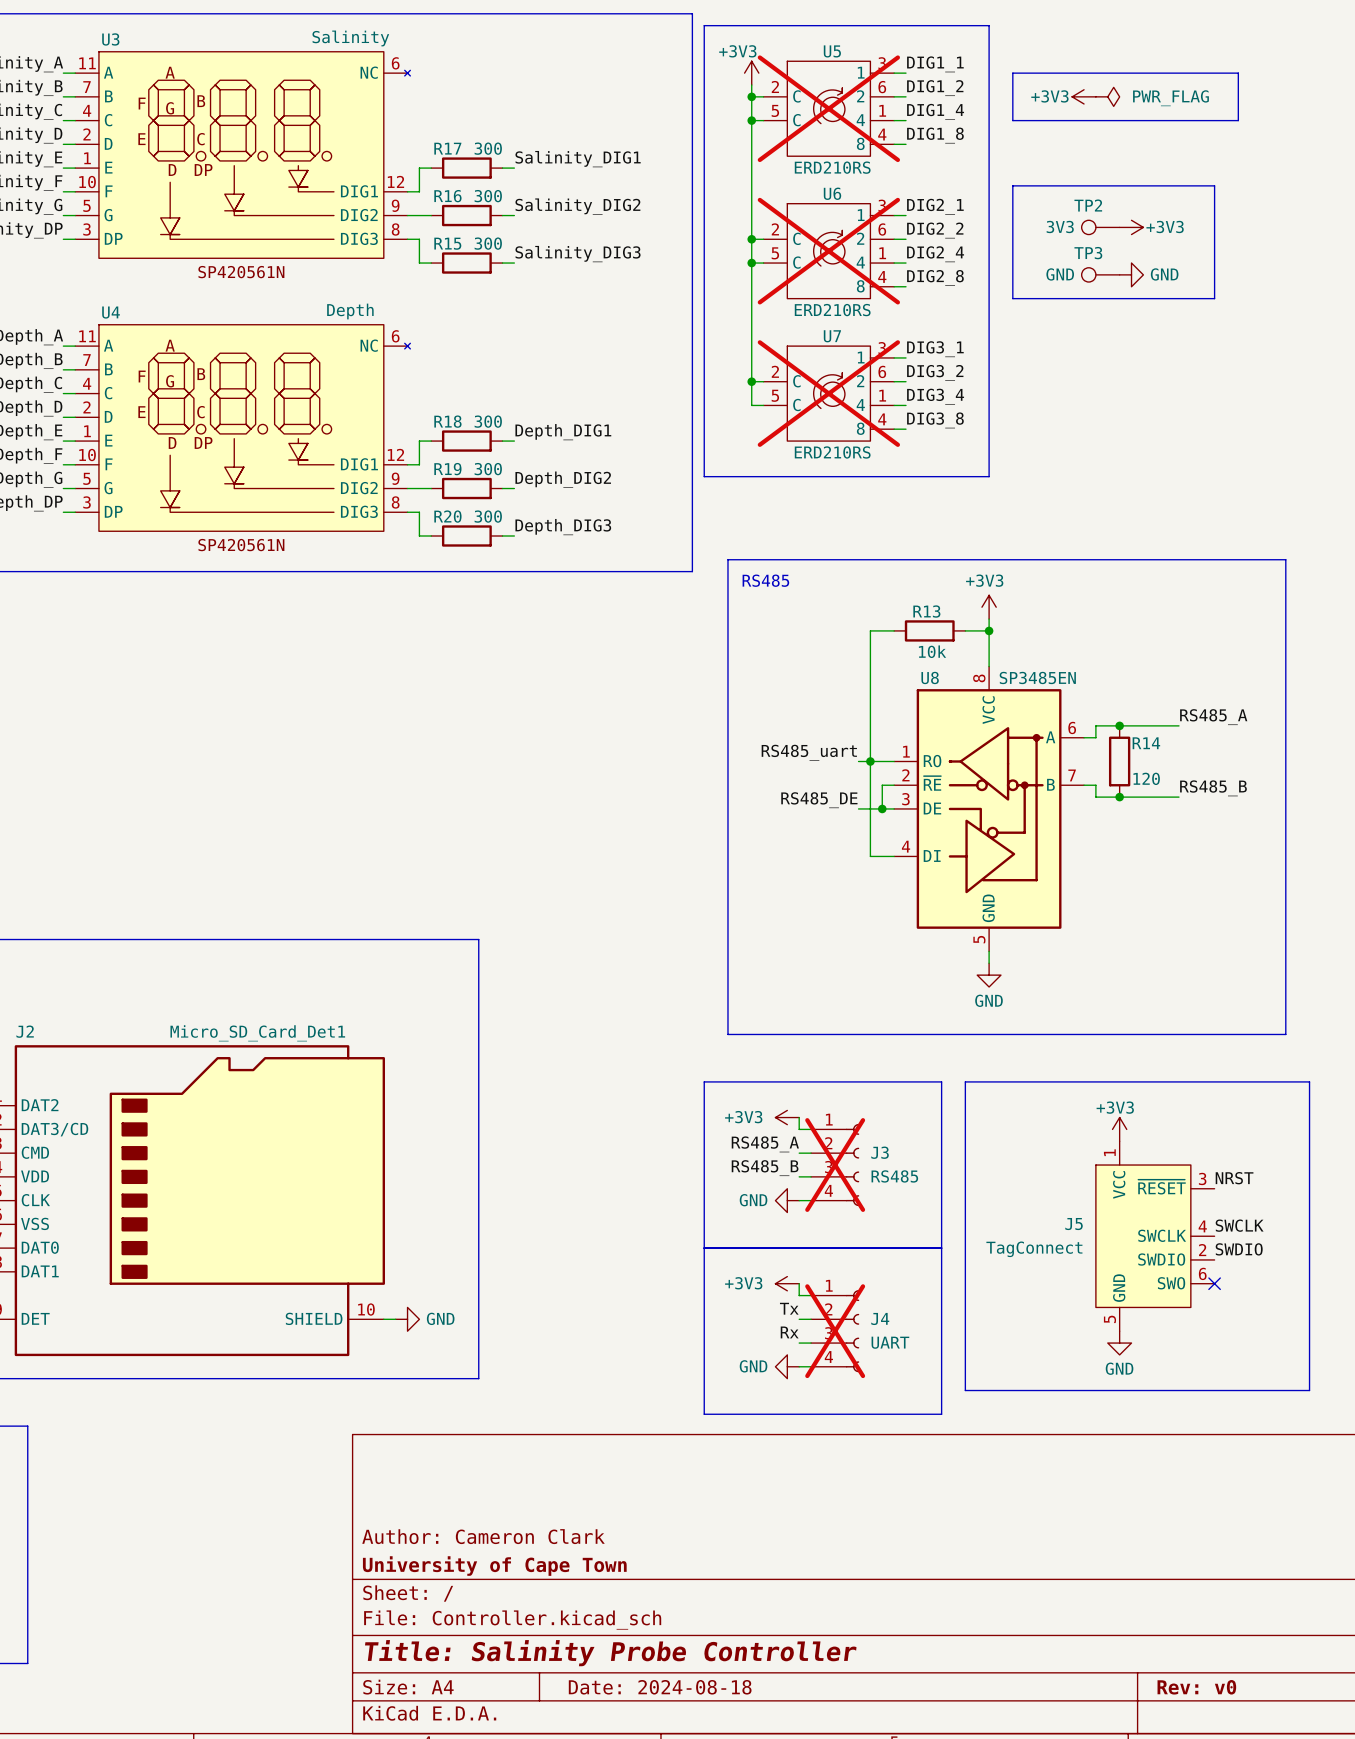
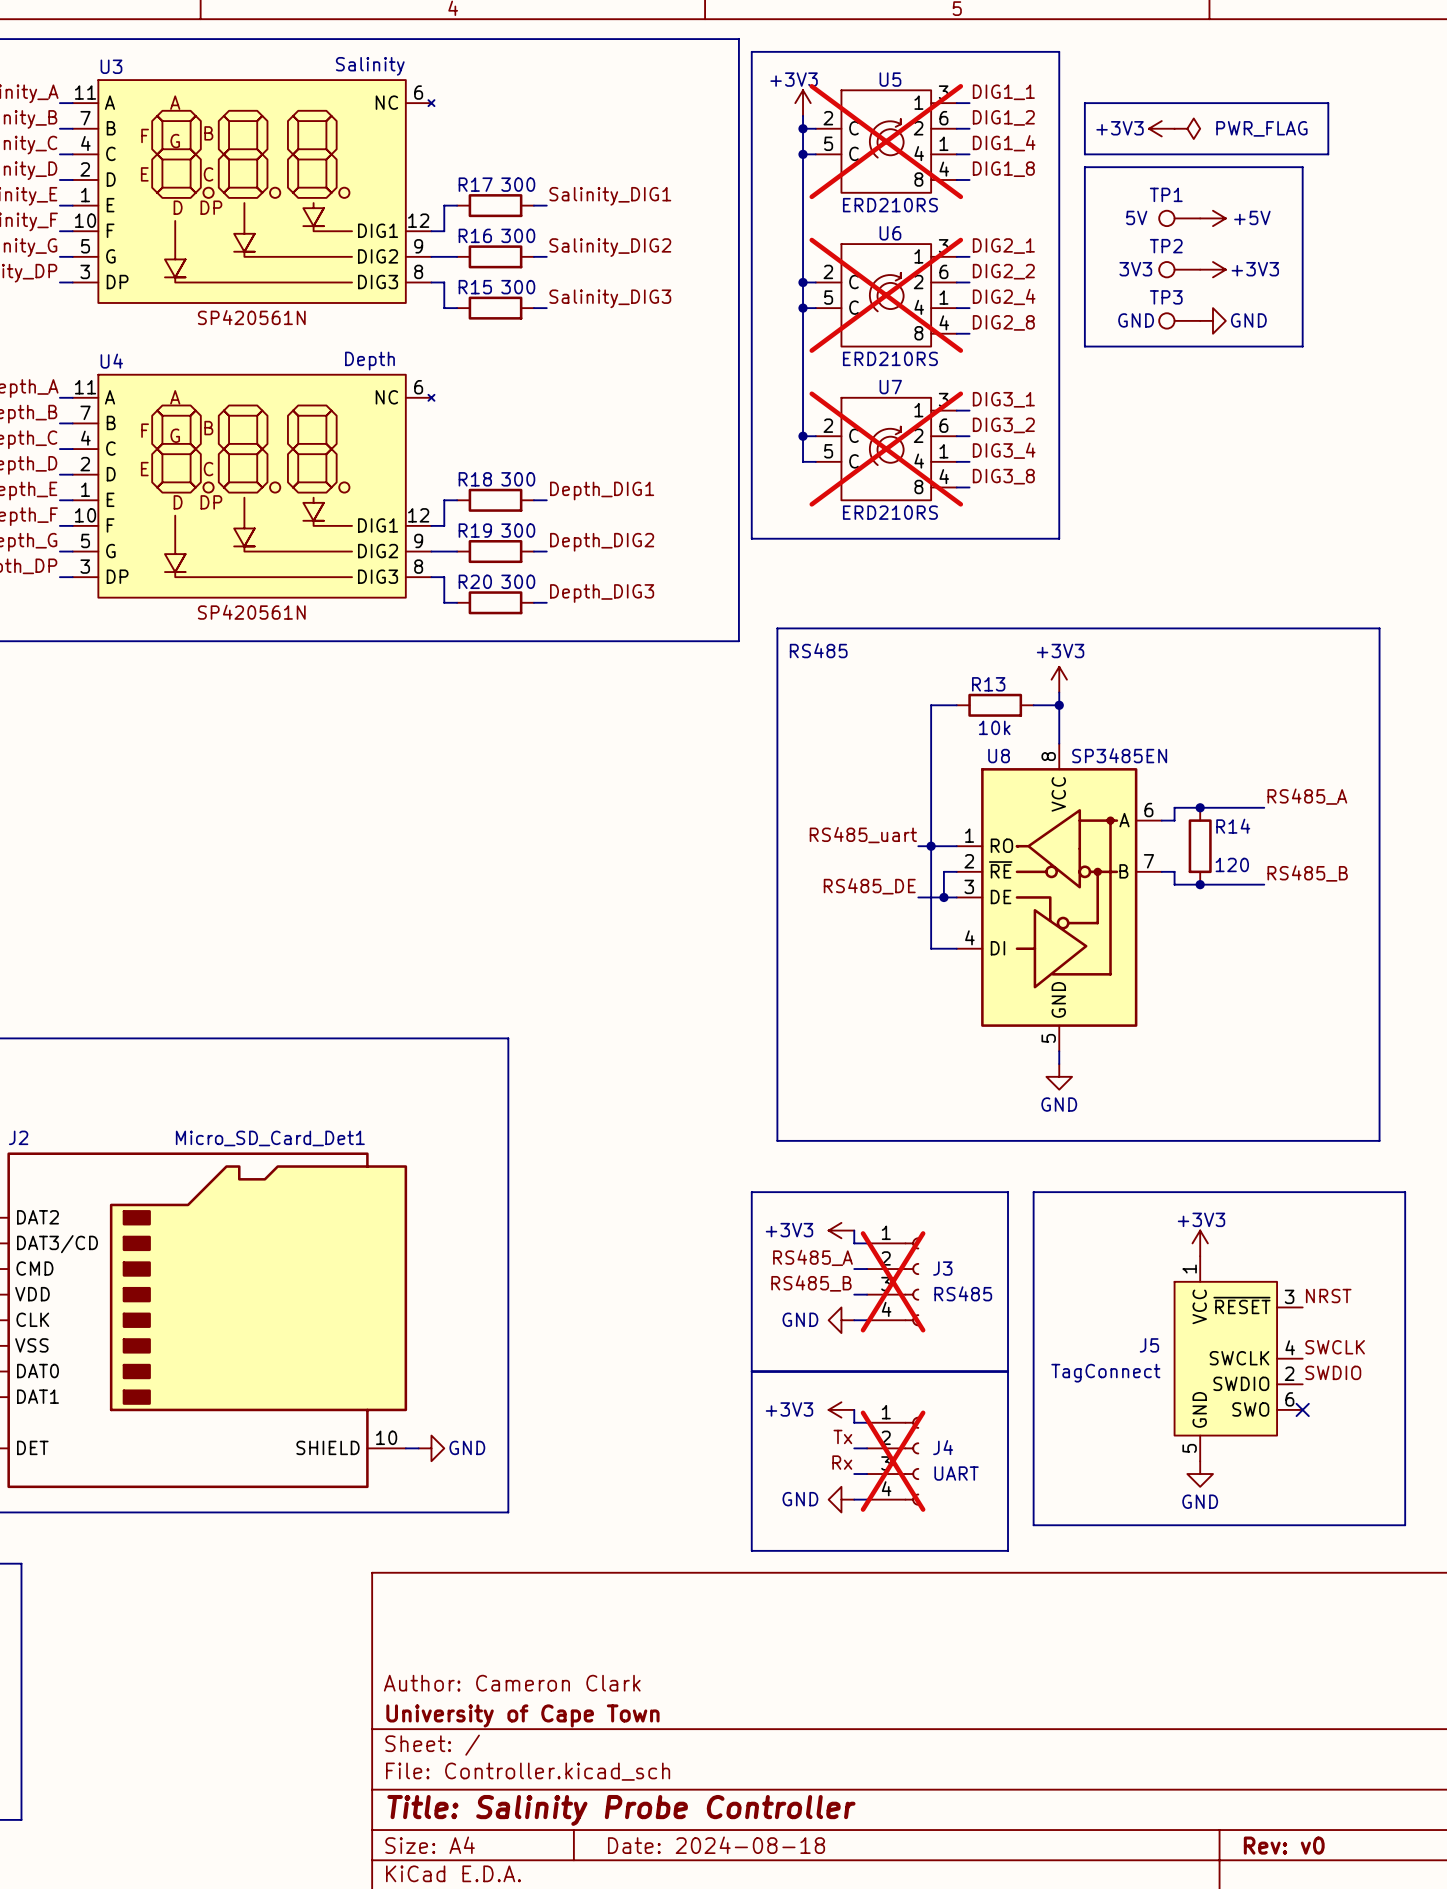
TP1: none -> 5V (1179, 218)
power symbol: none -> +5V (1212, 218)
line: (1012, 185) (1214, 185) -> (1084, 224) (1084, 167) (1302, 167) (1302, 224)

